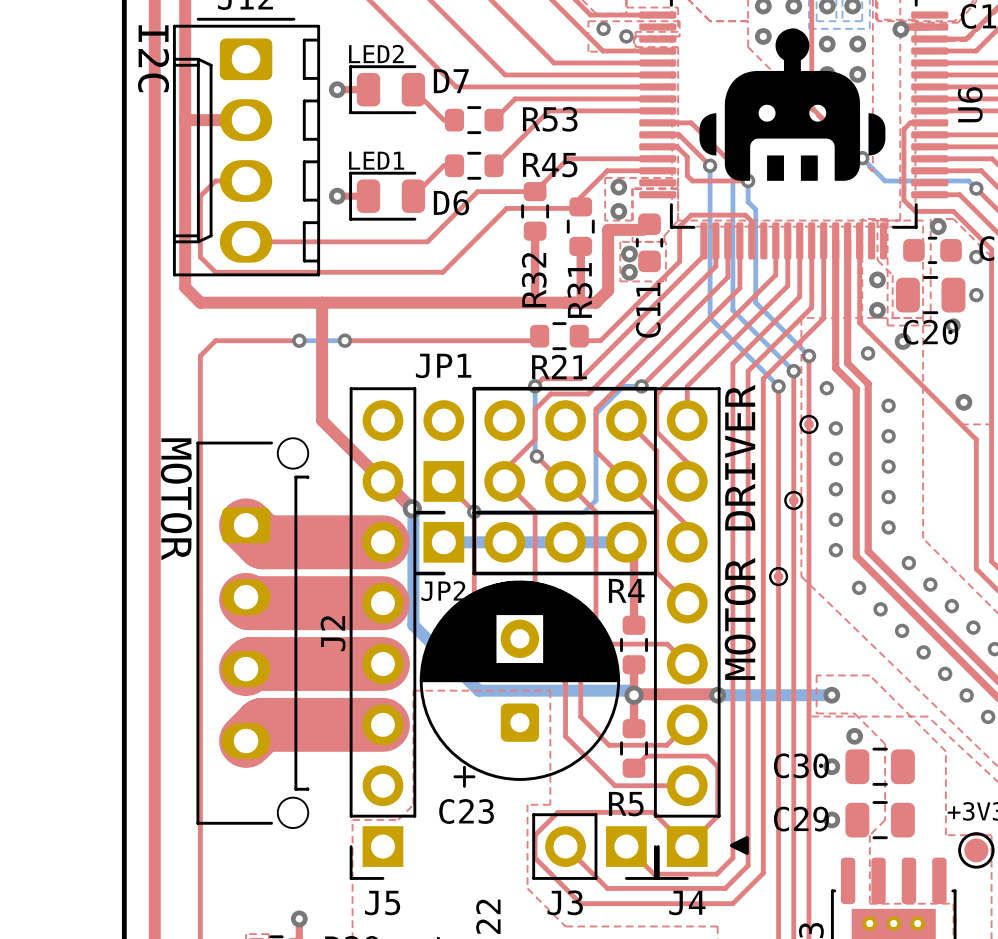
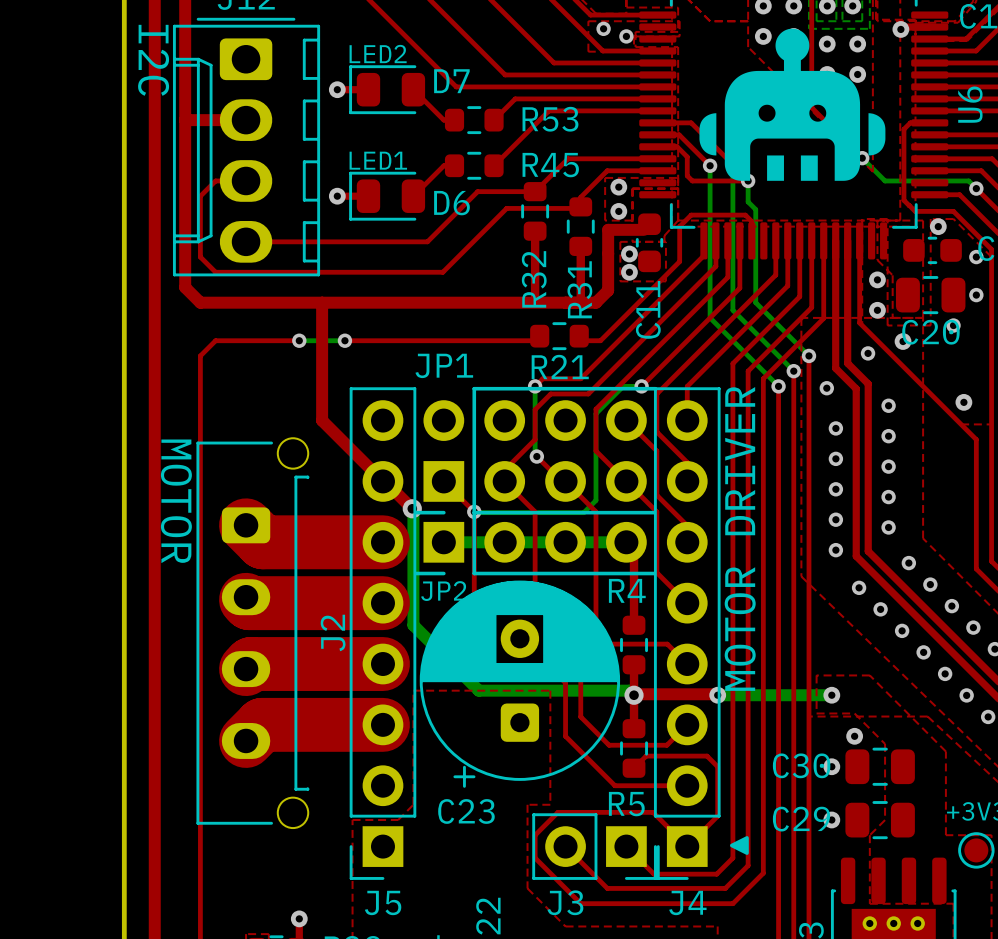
part: (808, 424) -> none
part: (793, 500) -> none
part: (778, 576) -> none

